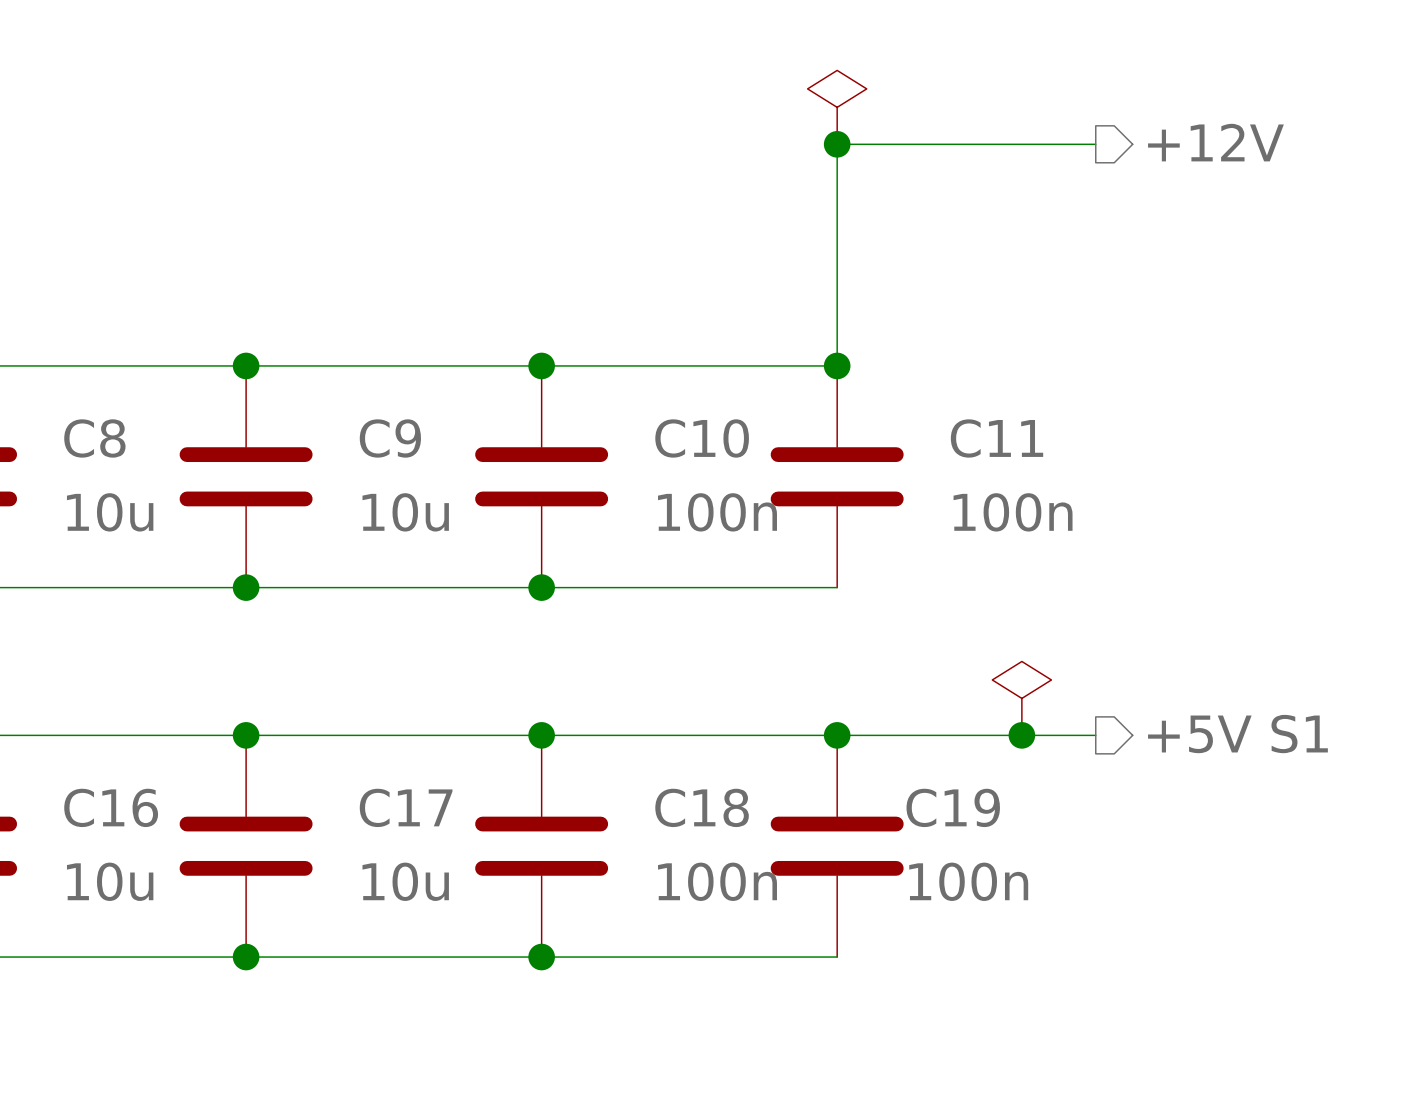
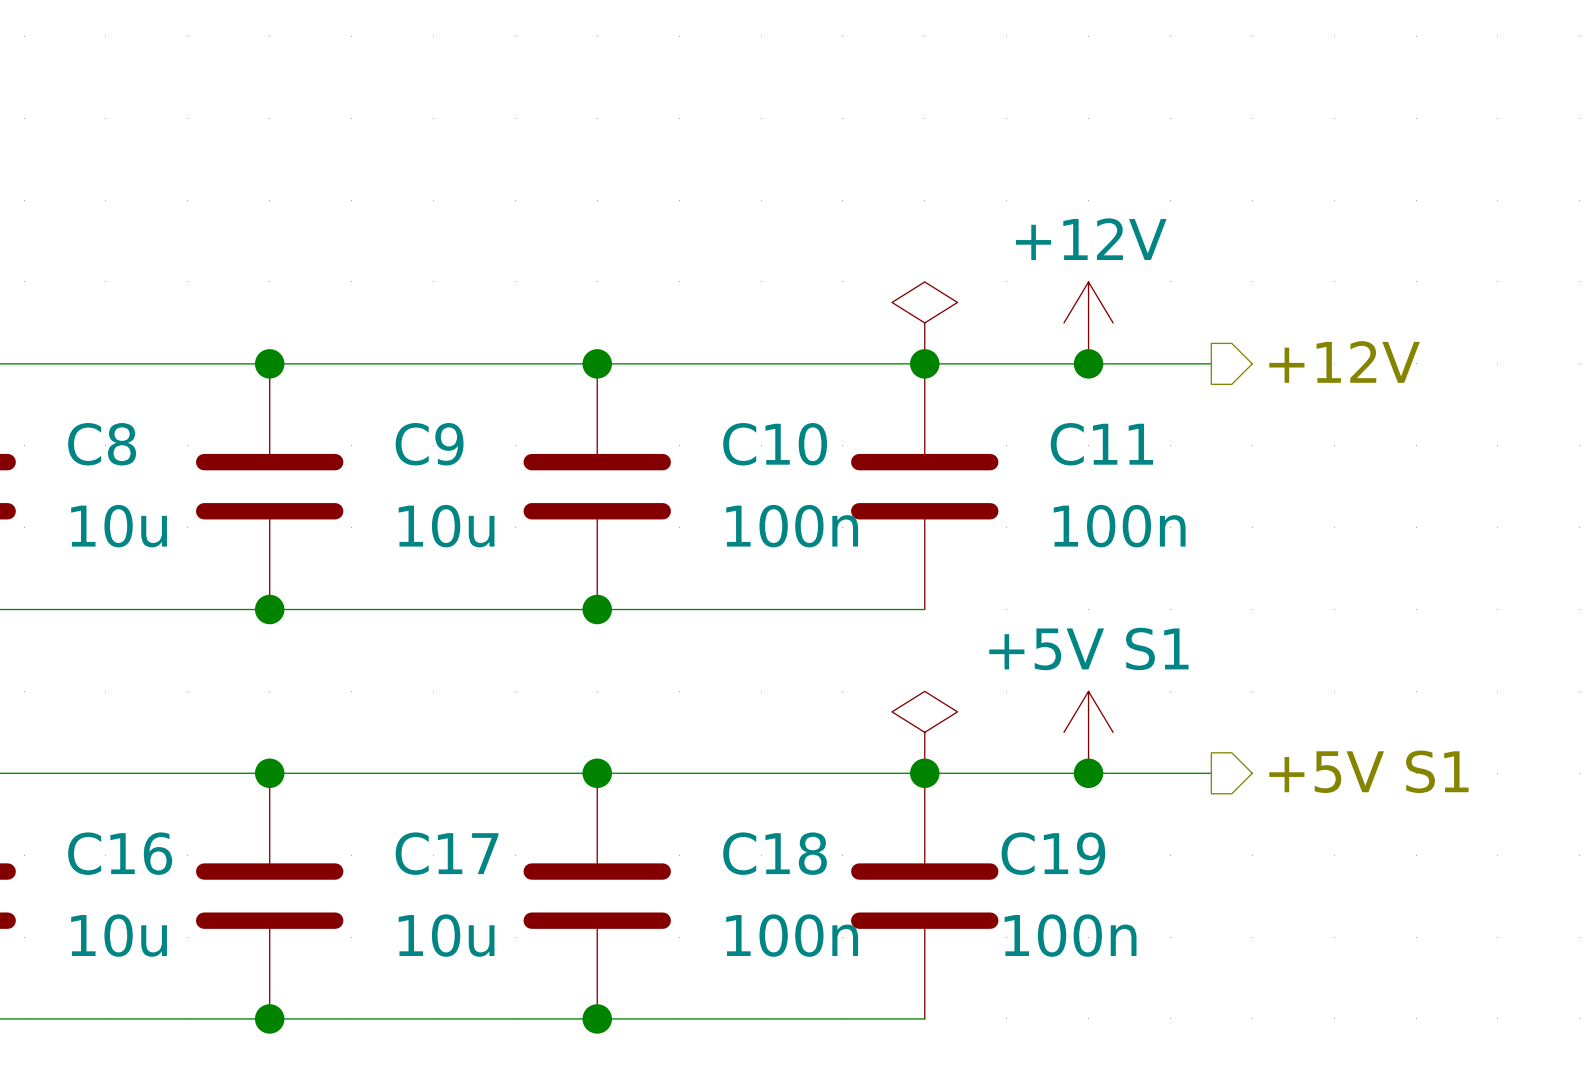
power symbol: (837, 107) -> none
hierarchical label position: +12V (1215, 142) -> +12V (1344, 361)
junction: (837, 144) -> none
wire: (1095, 144) (837, 144) (837, 365) -> (1211, 363) (924, 363)
power symbol: none -> (924, 322)
power symbol: none -> +12V (1088, 322)
junction: none -> (1088, 363)
power symbol: none -> +5V S1 (1088, 732)
power symbol position: (1021, 698) -> (924, 732)
junction position: (1021, 735) -> (1088, 773)

